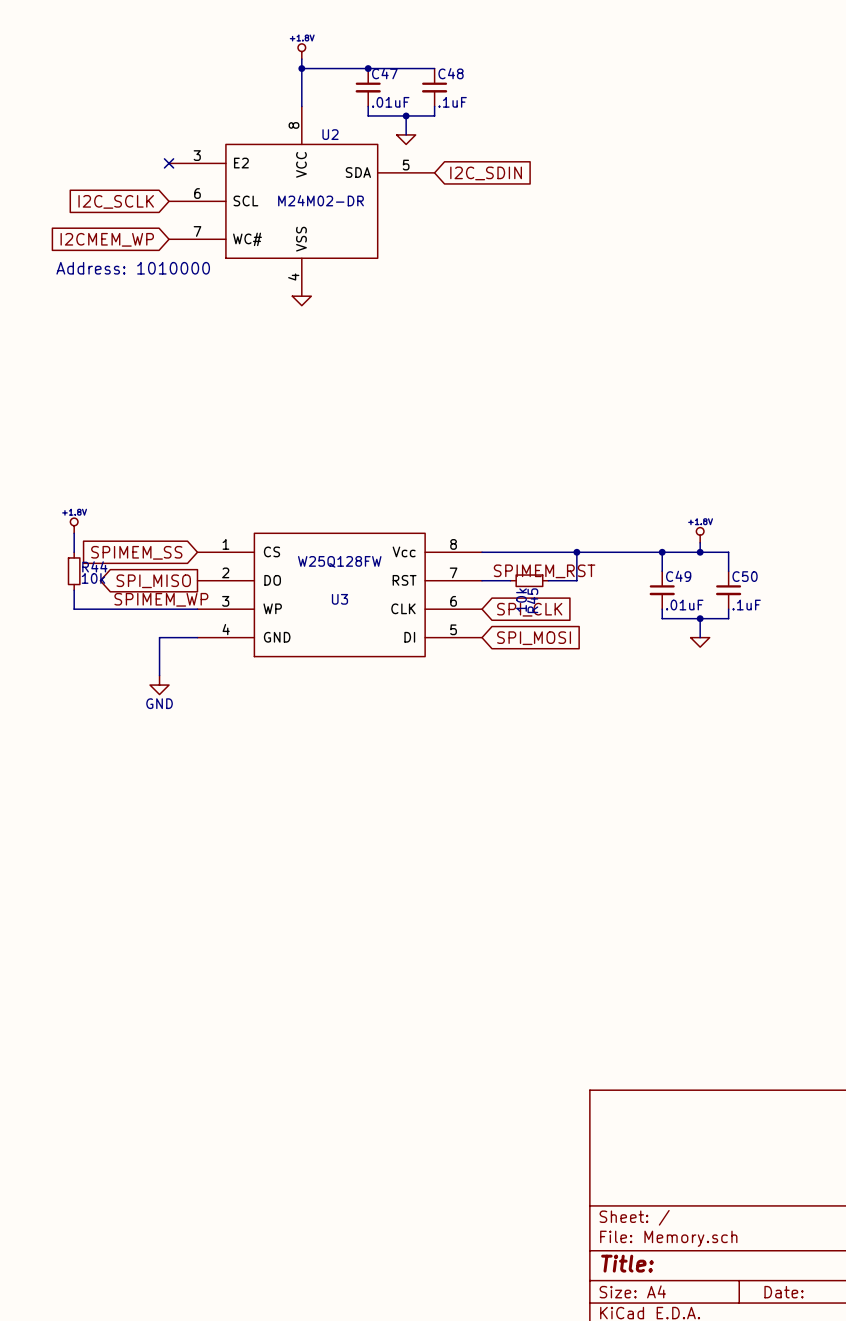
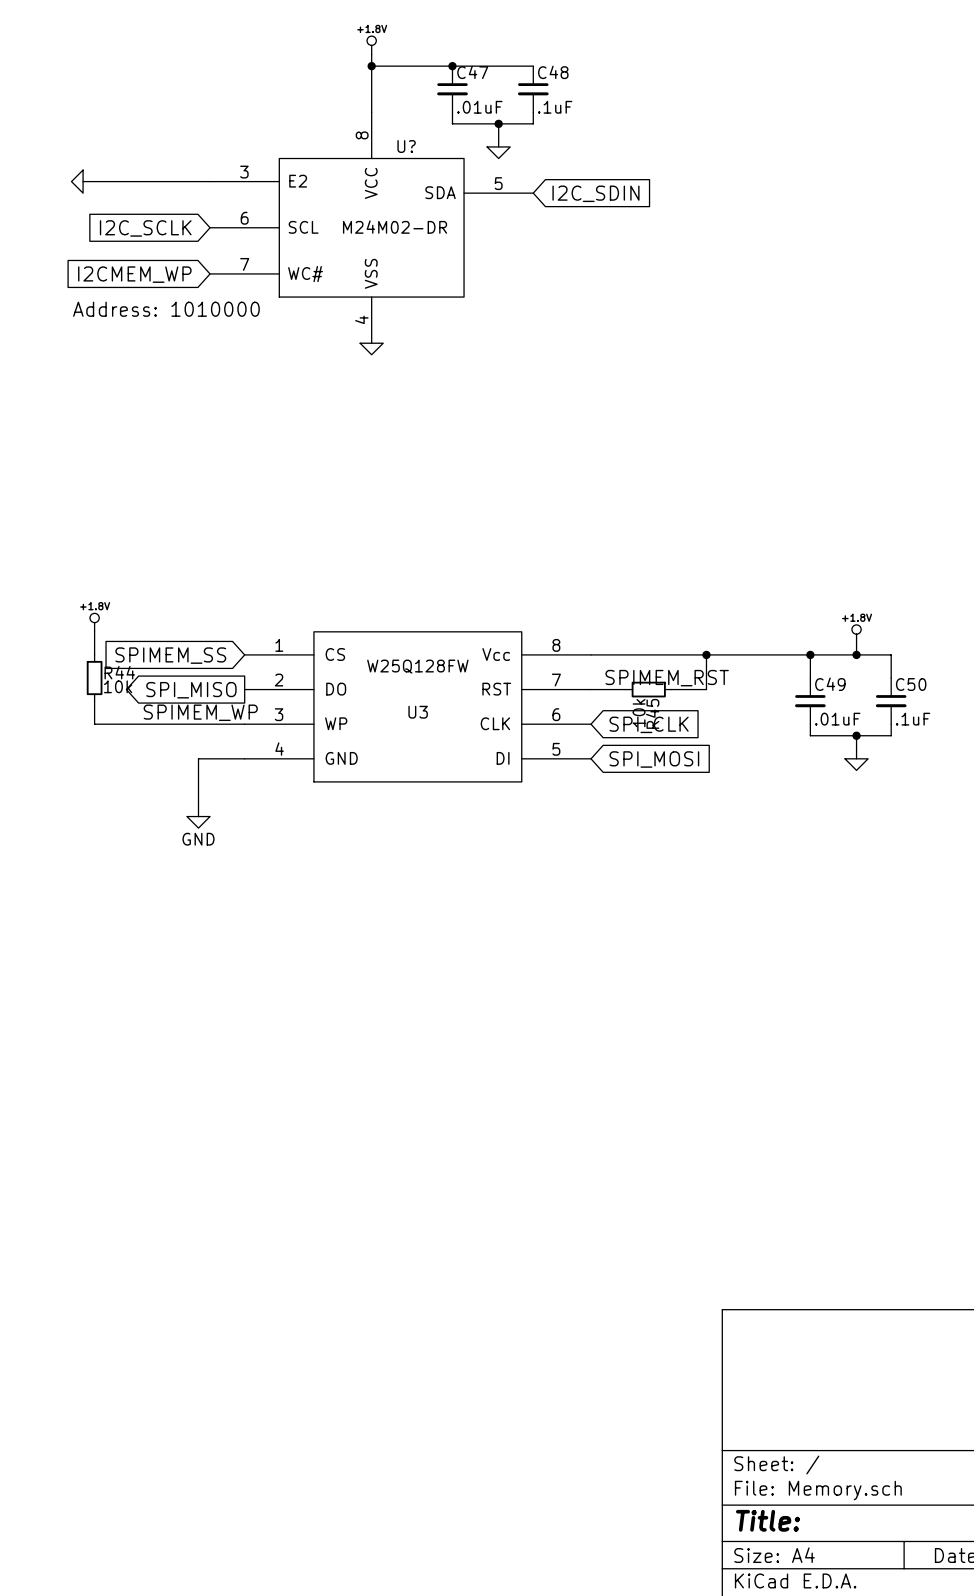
U2 name: U2 (330, 134) -> U? (406, 146)
power symbol: none -> (77, 181)
wire: none -> (83, 181) (210, 181)
no-connect mark: (169, 163) -> none

